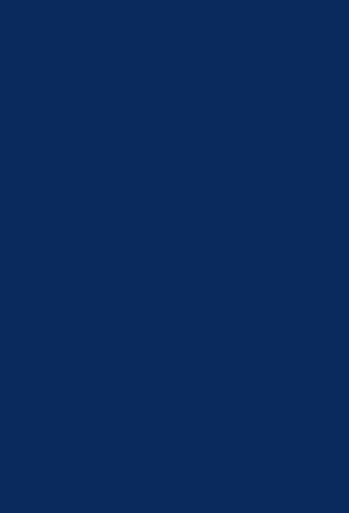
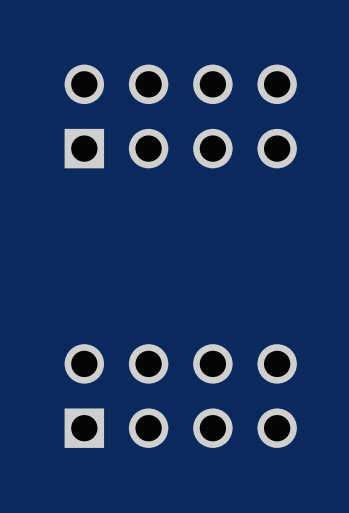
part: none -> (180, 116)
part: none -> (180, 396)

